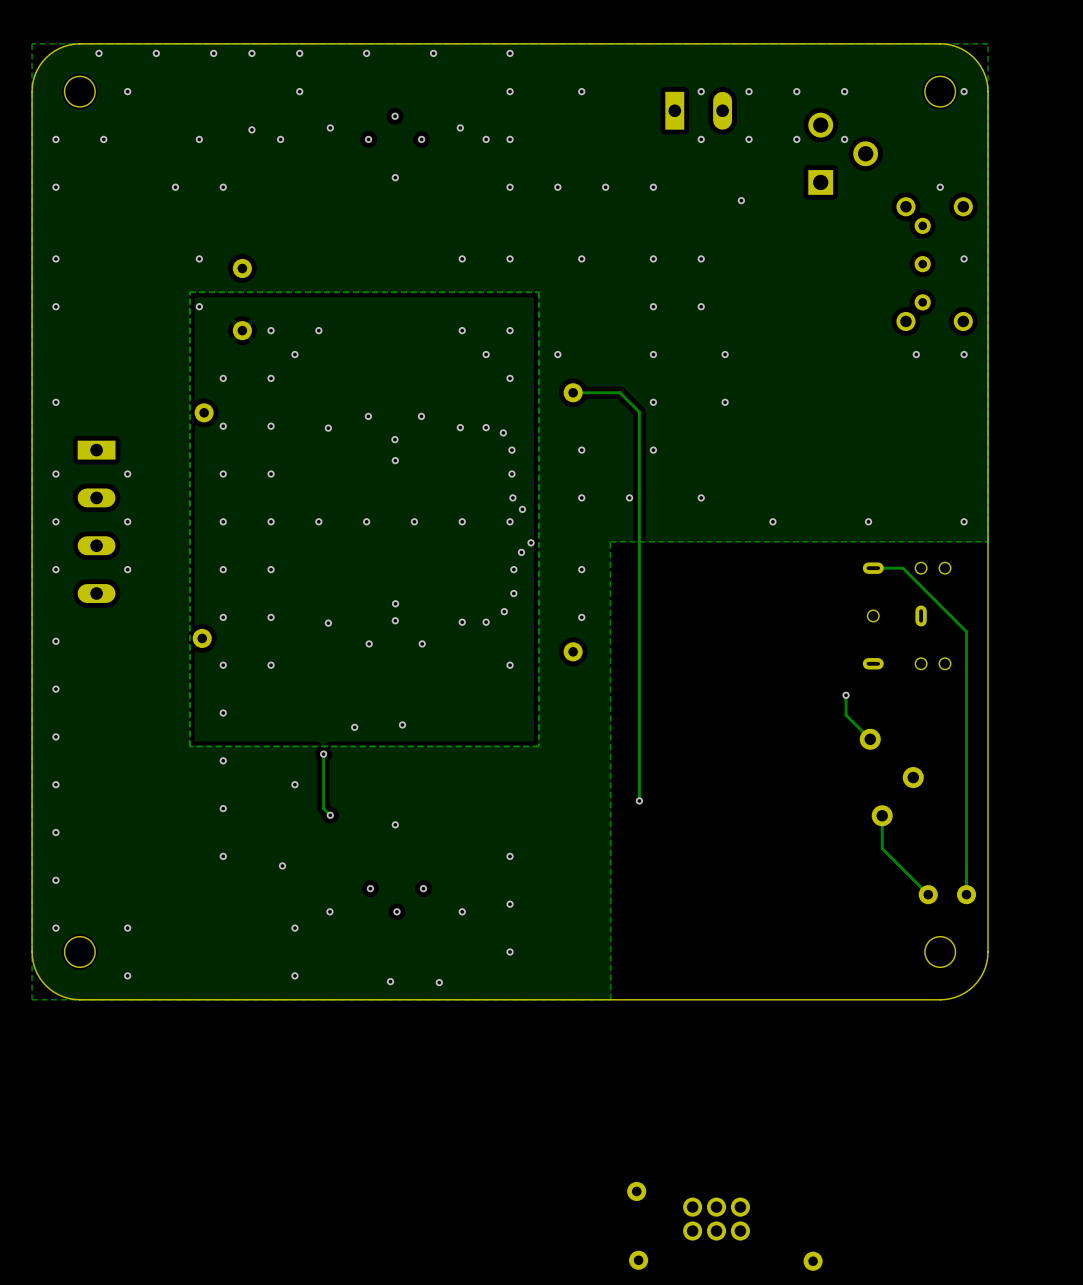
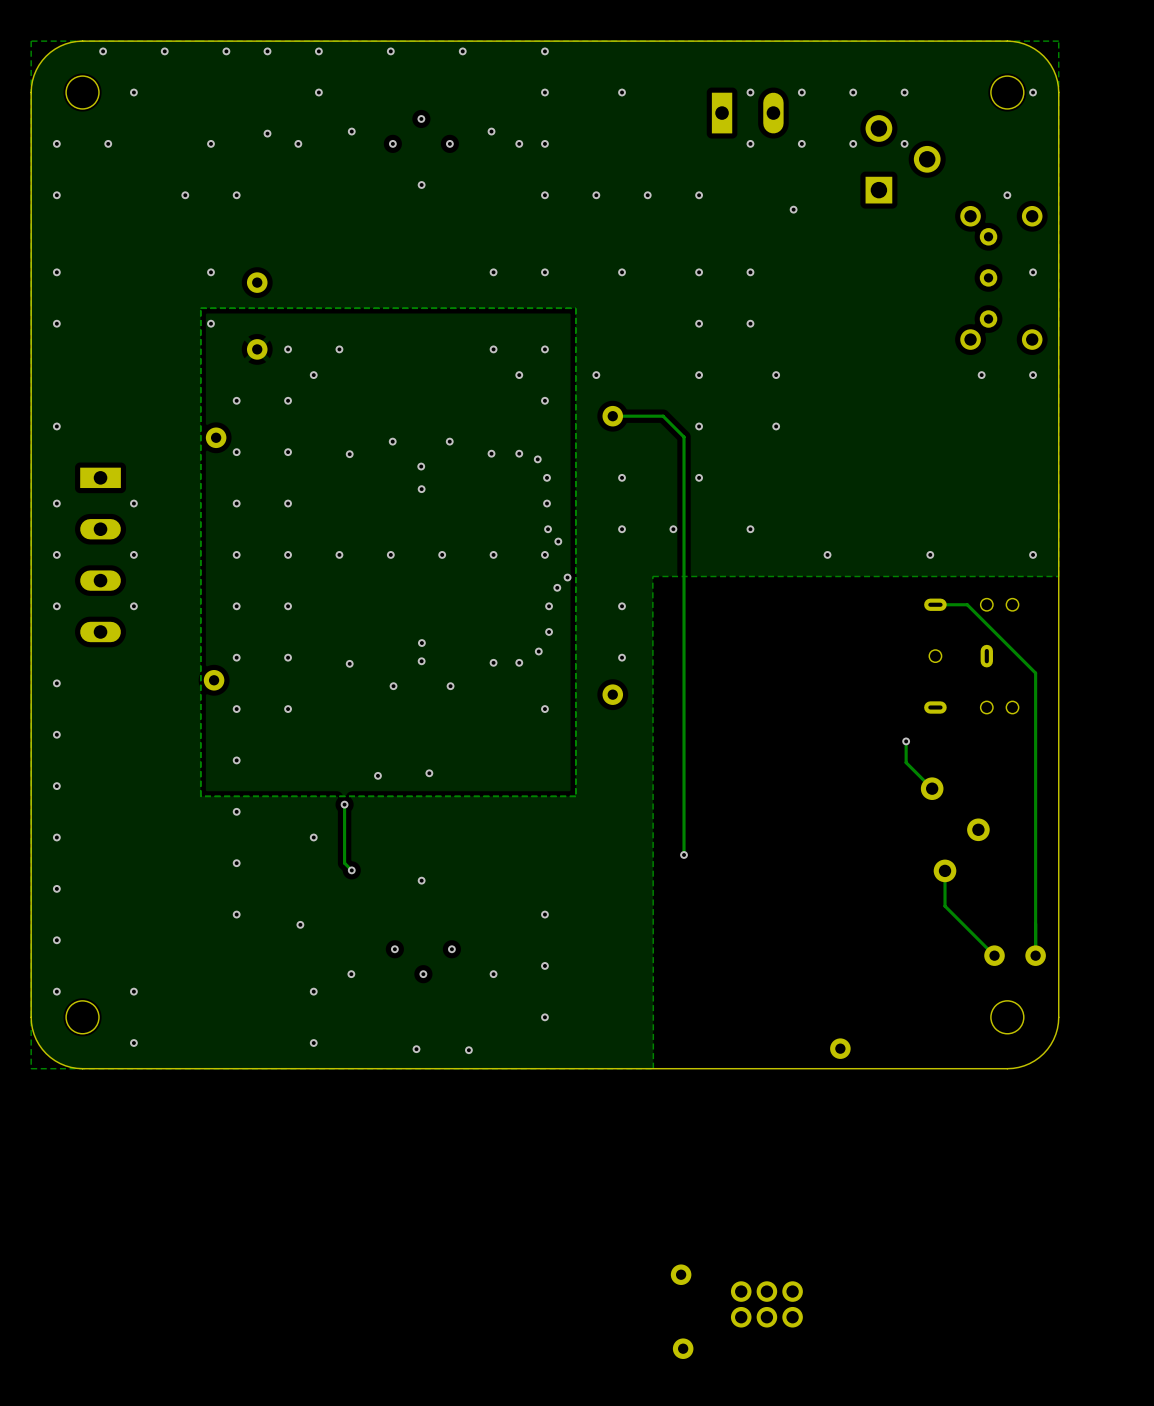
part: none -> (840, 1048)
part: (813, 1261) -> none

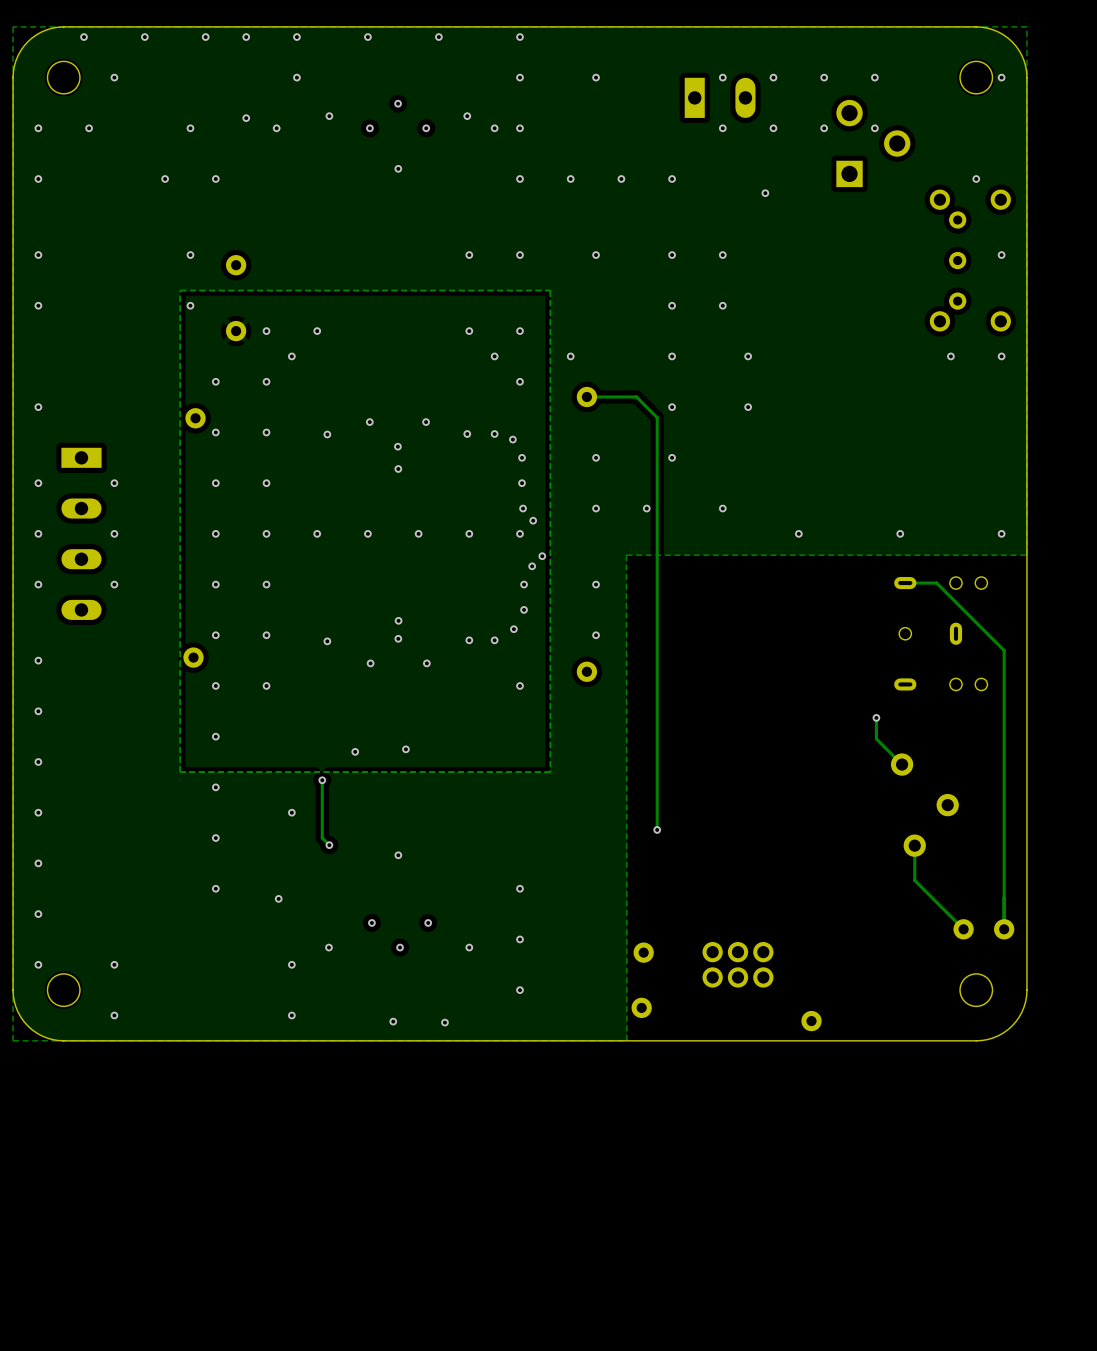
part: none -> (643, 952)
part: none -> (737, 964)
part: none -> (641, 1007)
part: (681, 1274) -> none
part: (766, 1304) -> none
part: (683, 1348) -> none

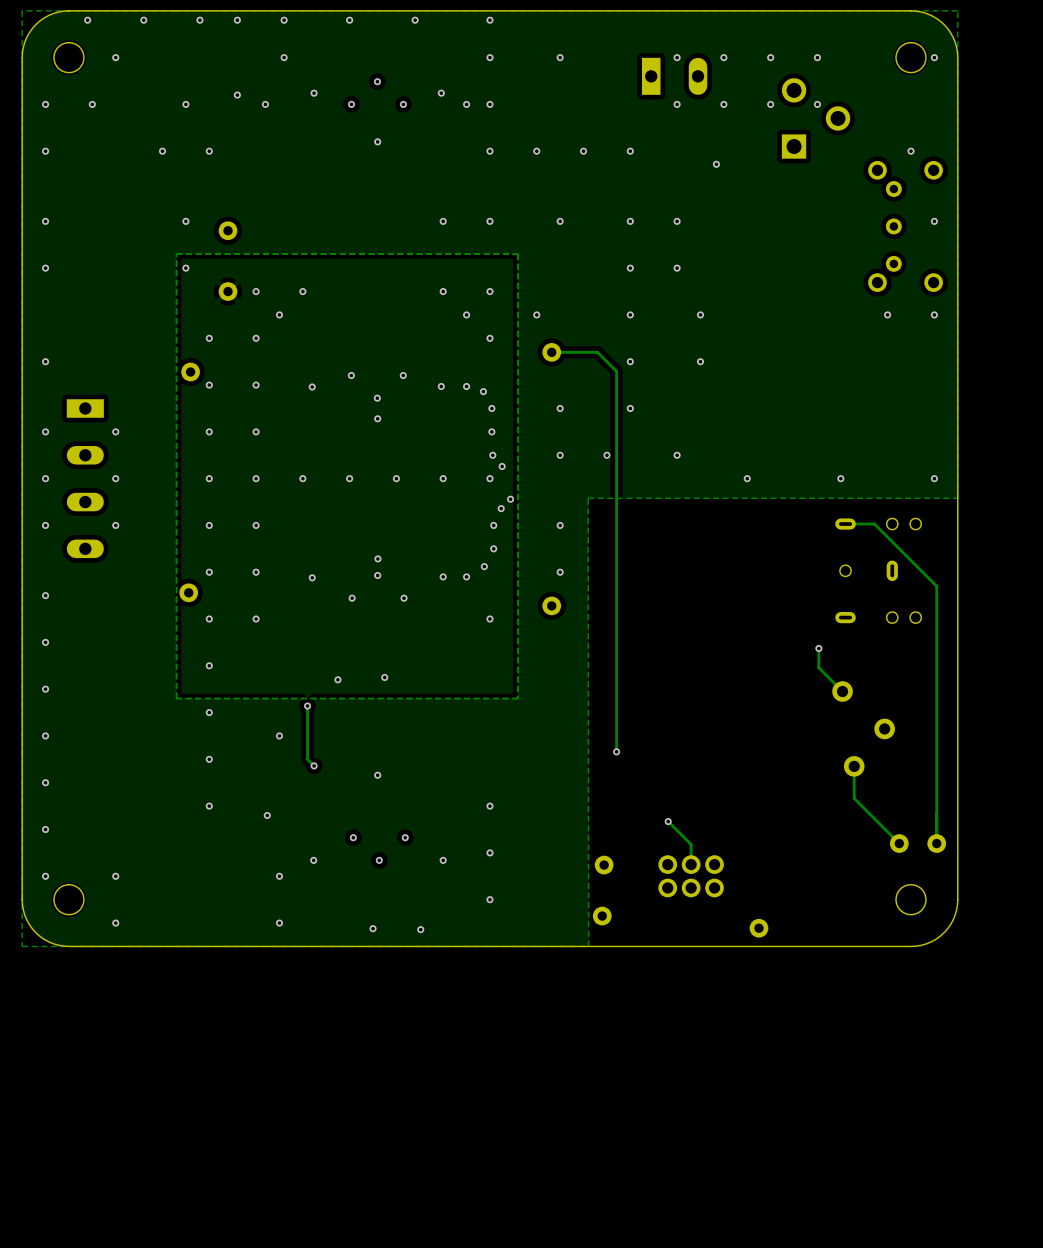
track: none -> (668, 821) (691, 844) (691, 864)
via: none -> (668, 821)

